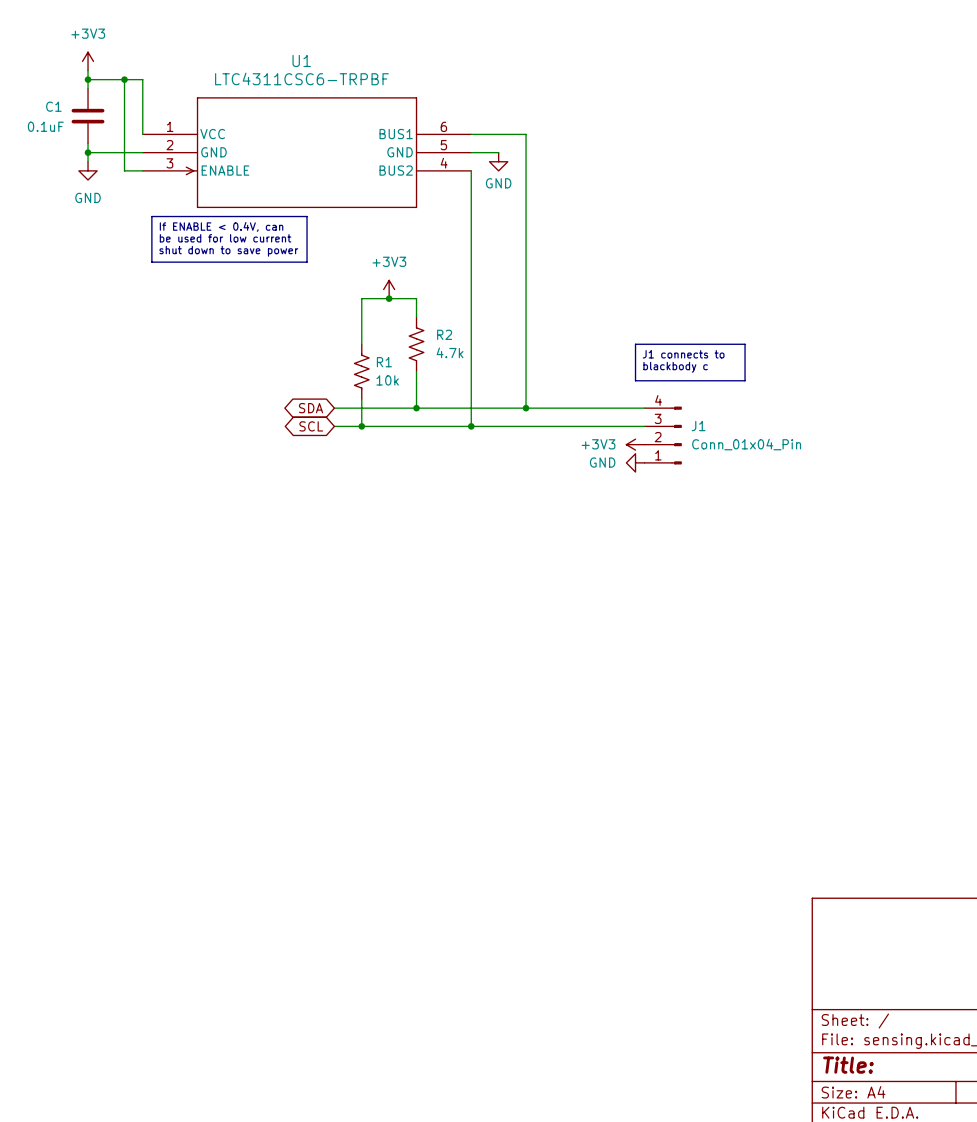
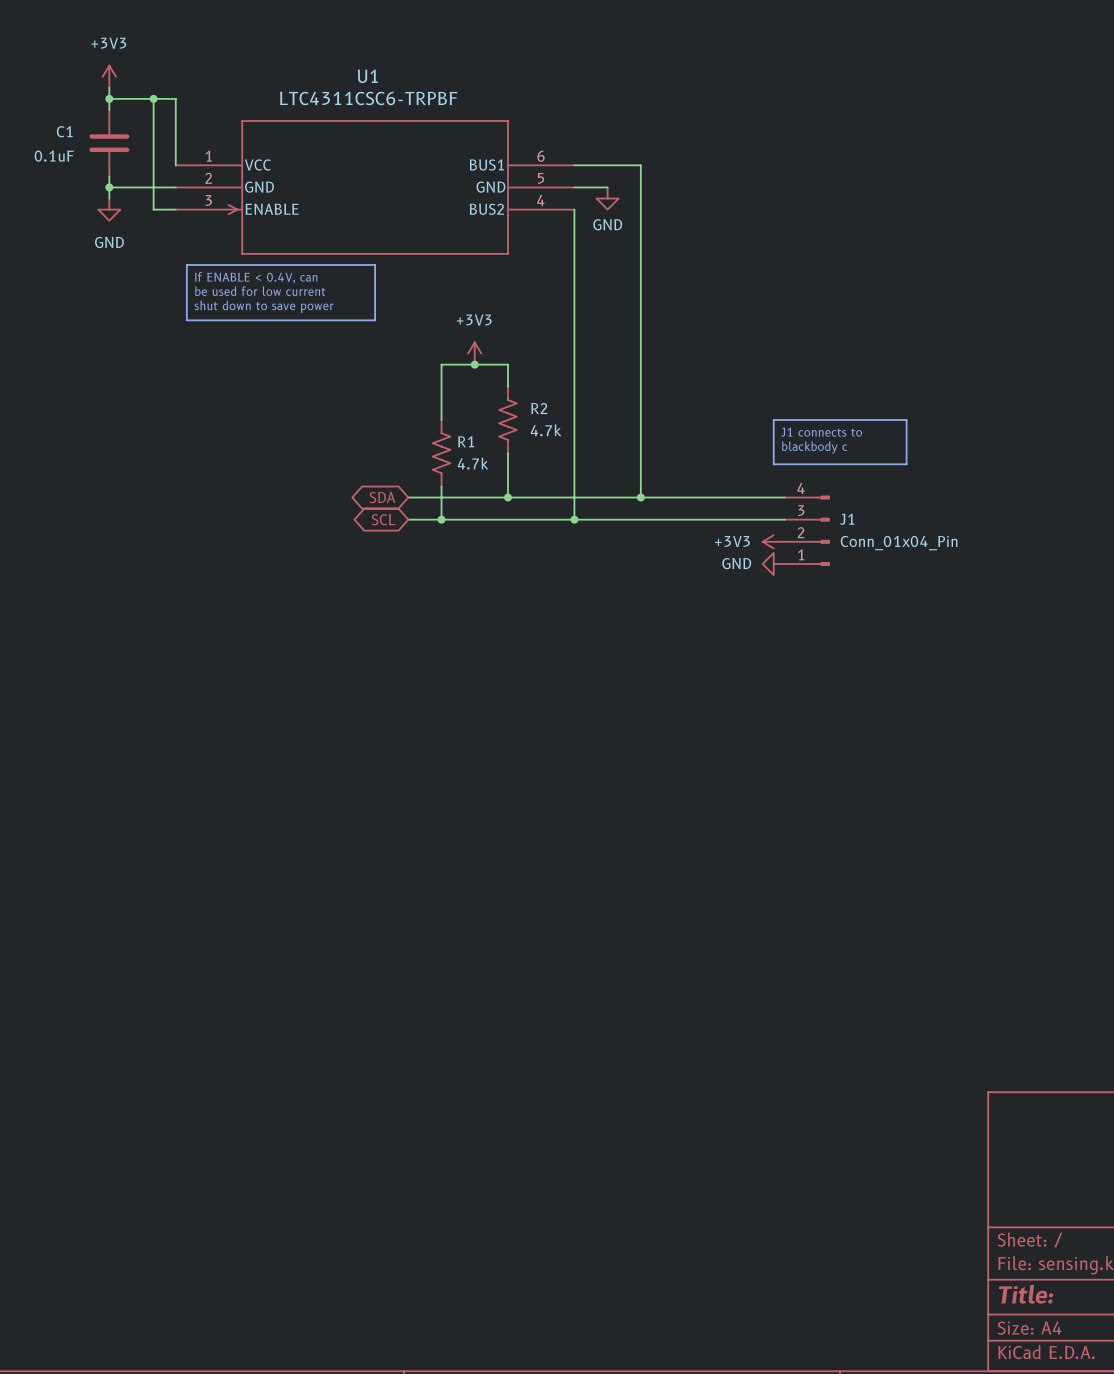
R1 value: 10k (387, 380) -> 4.7k (473, 463)

